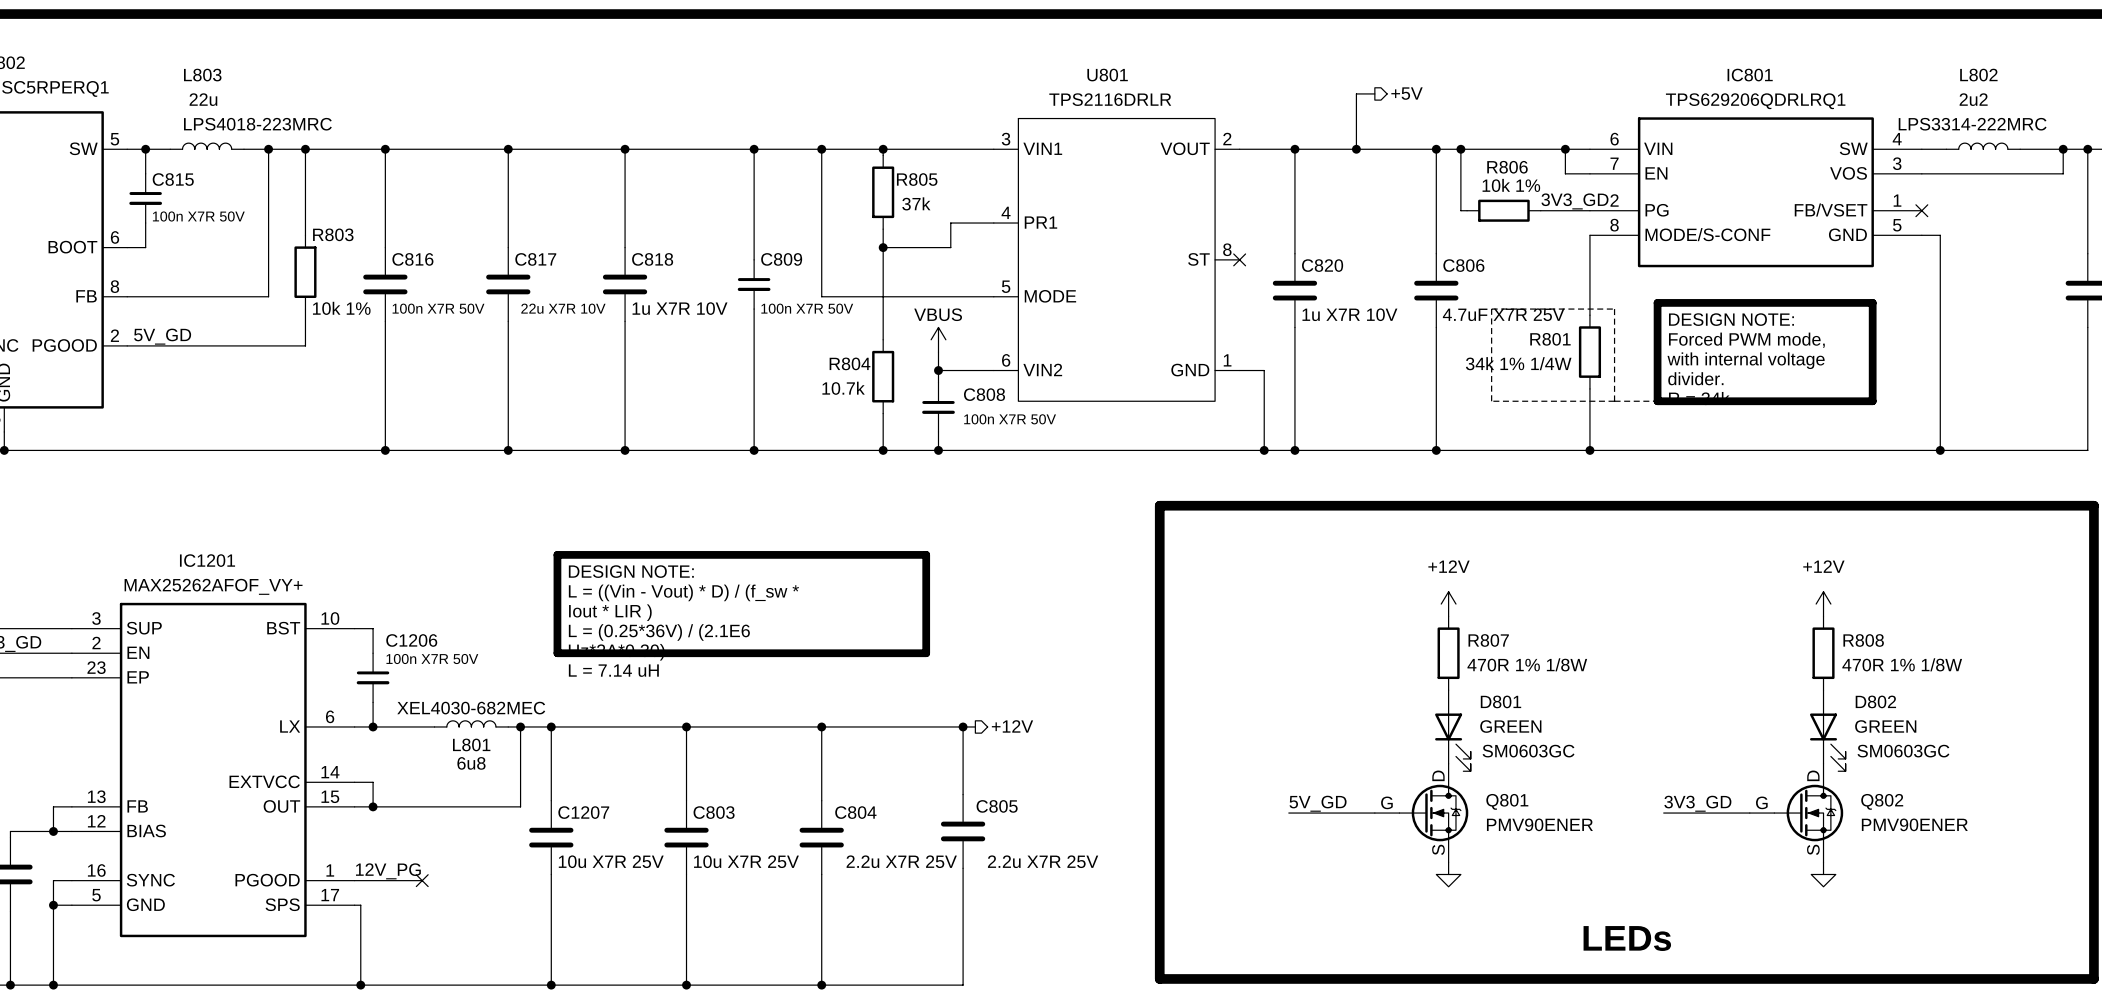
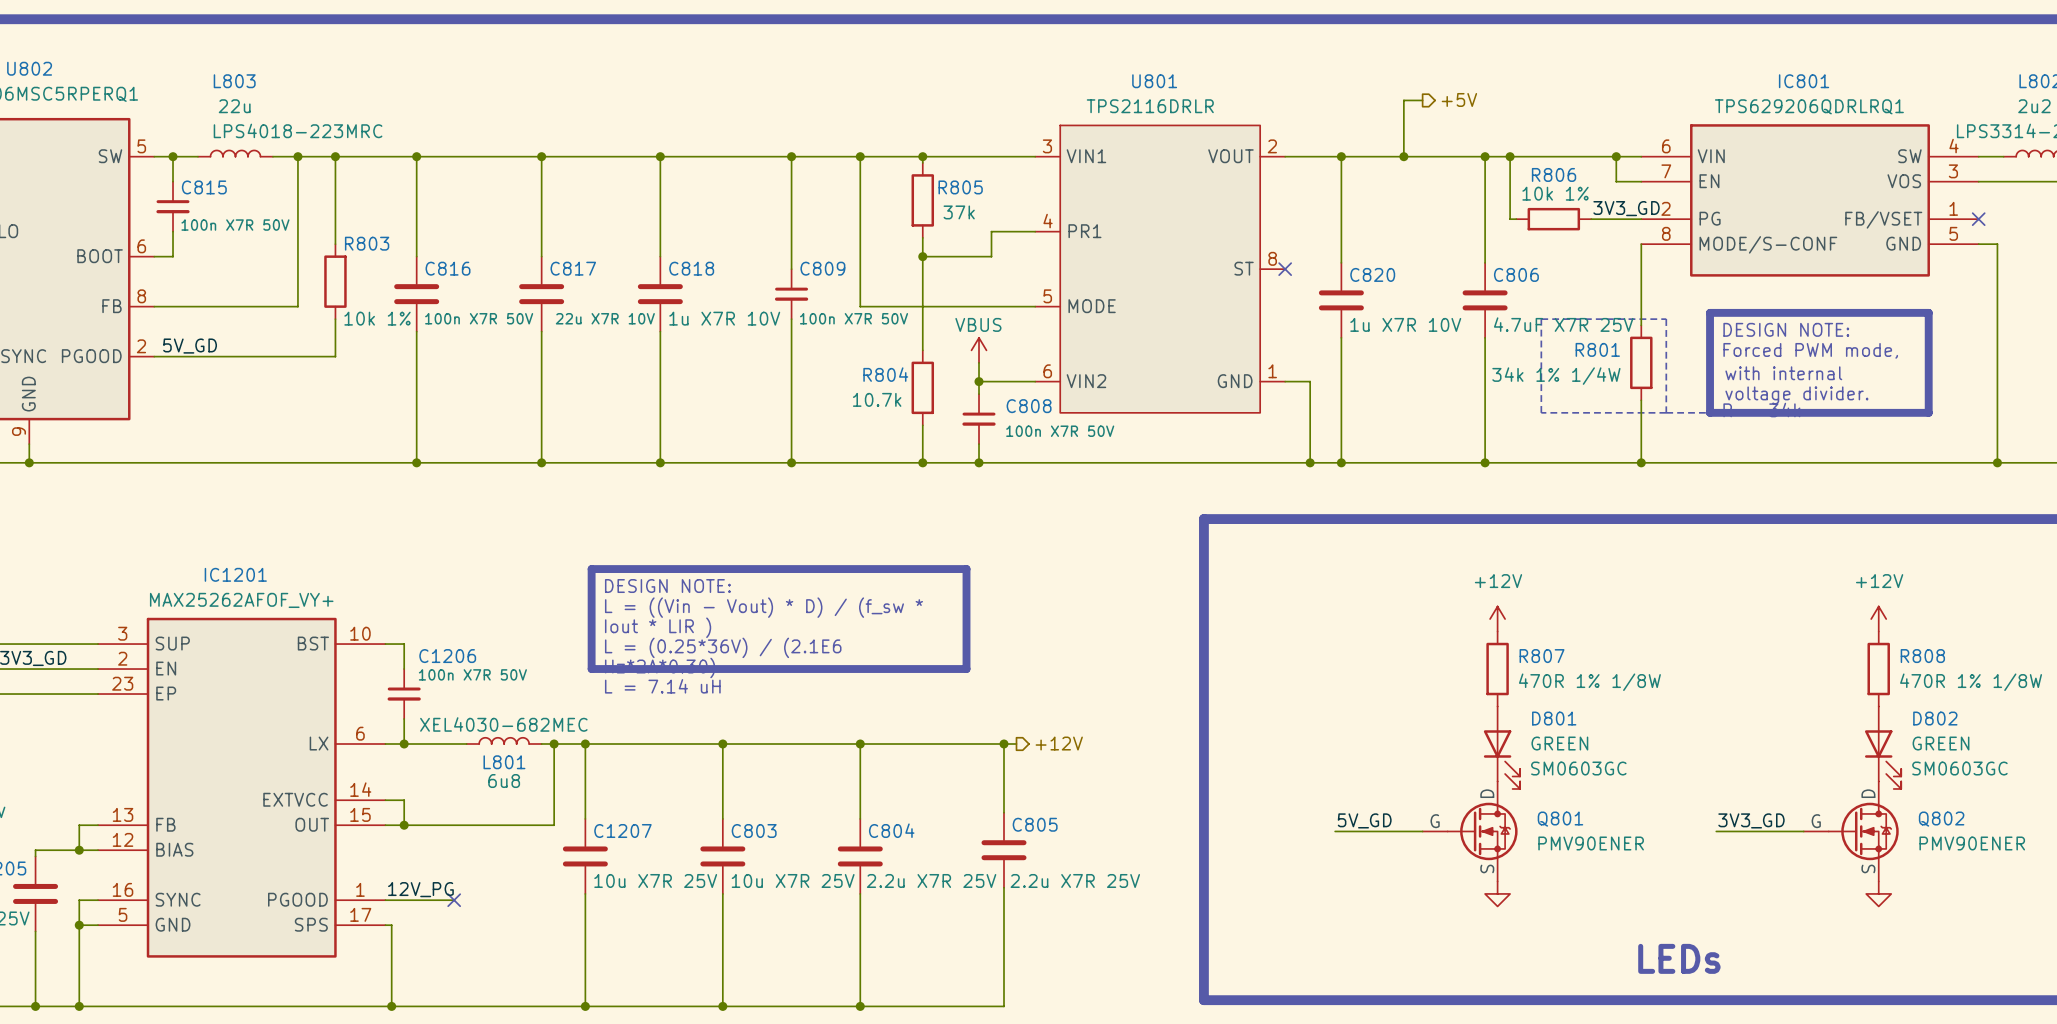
text: with internal voltage (1746, 360) -> with internal (1783, 373)
text: divider. (1695, 378) -> voltage divider. (1796, 395)

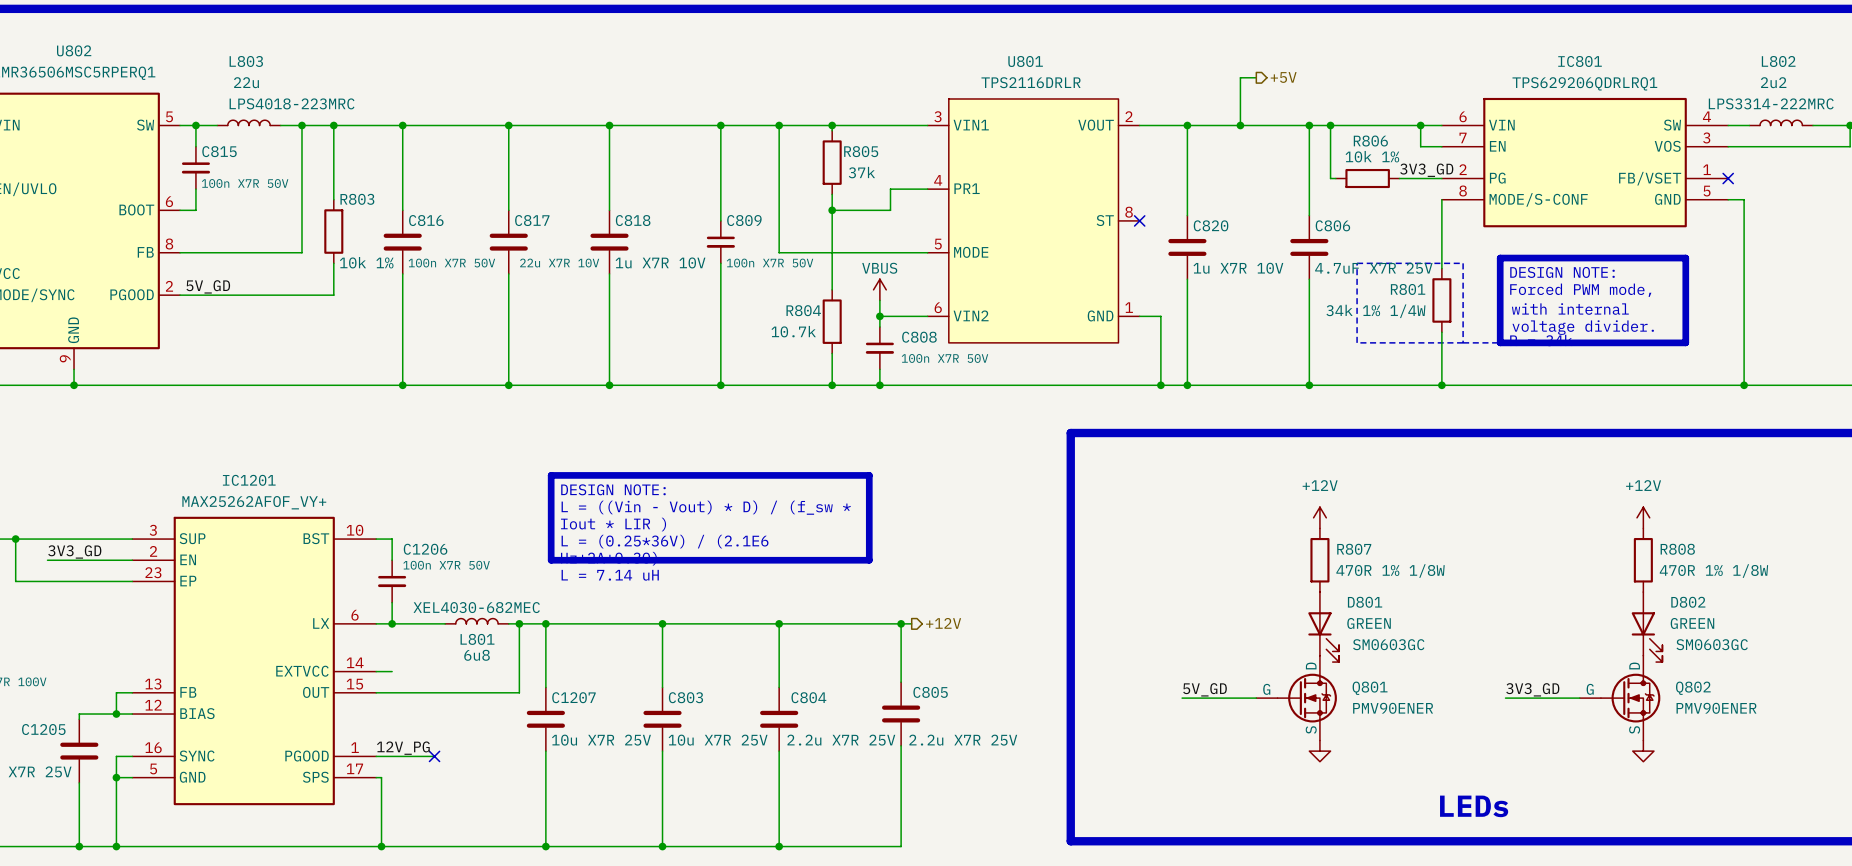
wire: (404, 800) (404, 825) -> none
junction: (404, 825) -> none

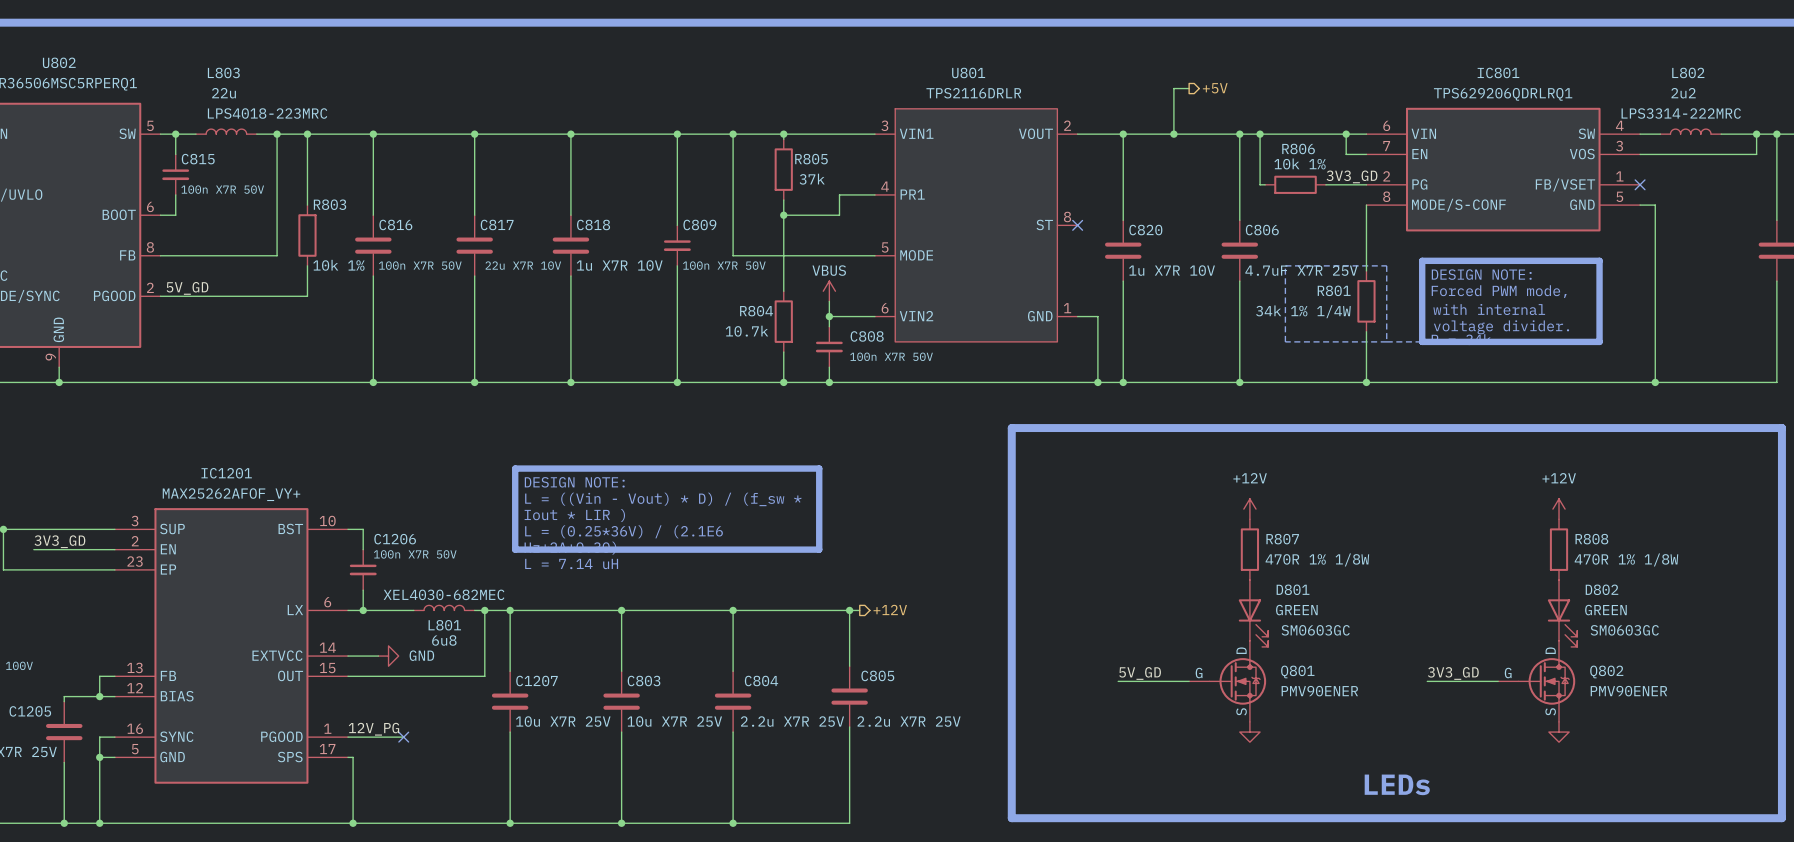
wire: none -> (363, 656) (378, 656)
power symbol: none -> GND (388, 656)

